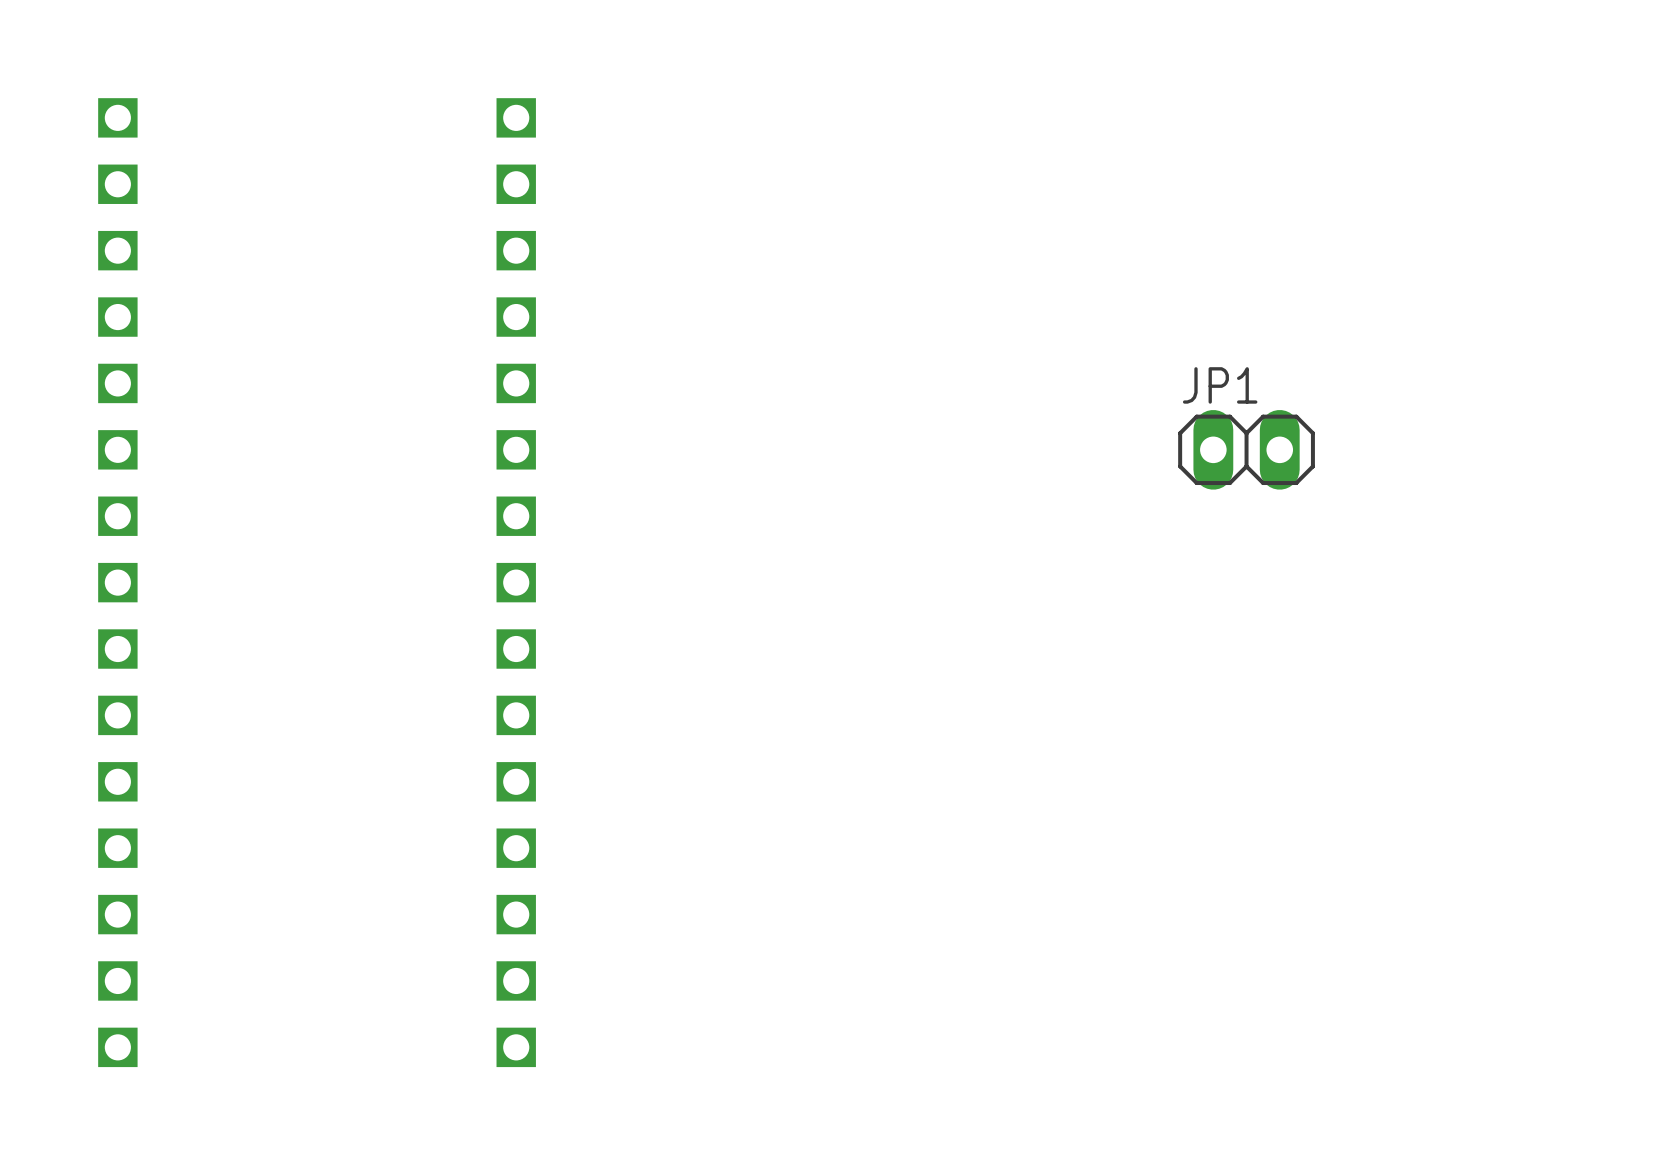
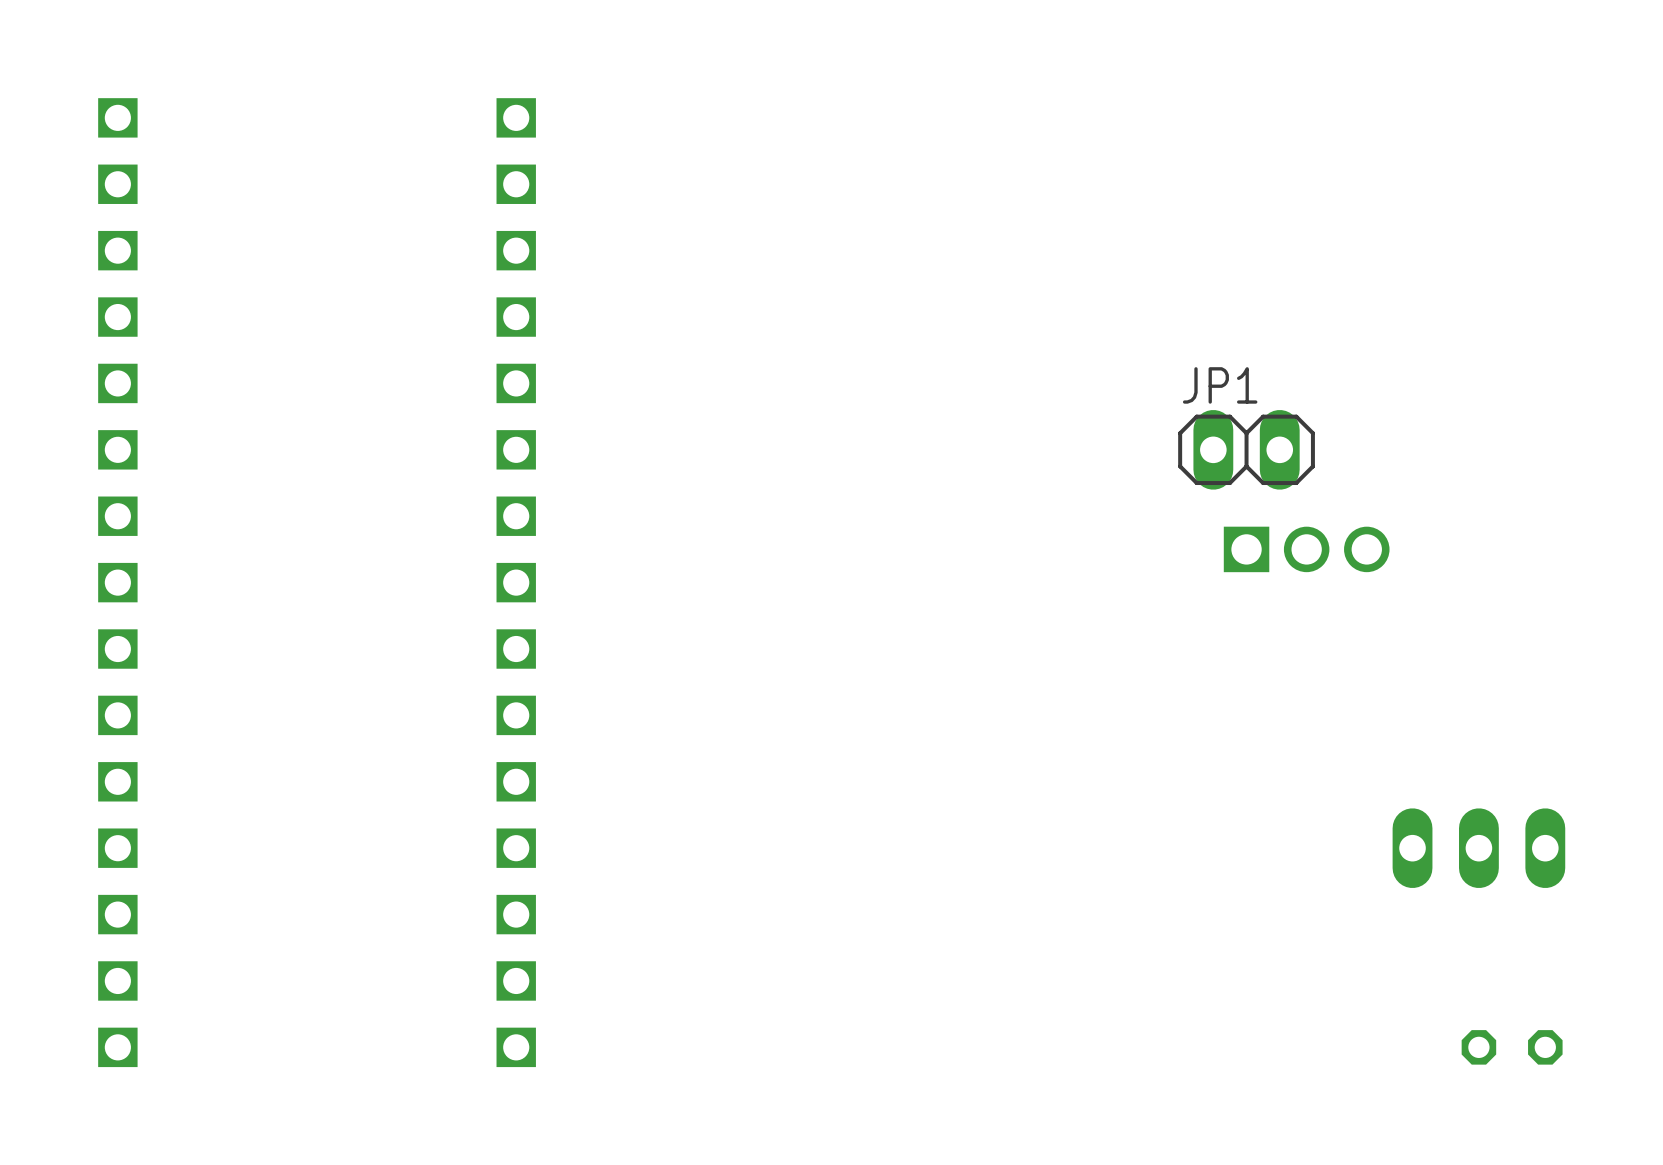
part: none -> (1306, 549)
part: none -> (1478, 848)
part: none -> (1512, 1047)

